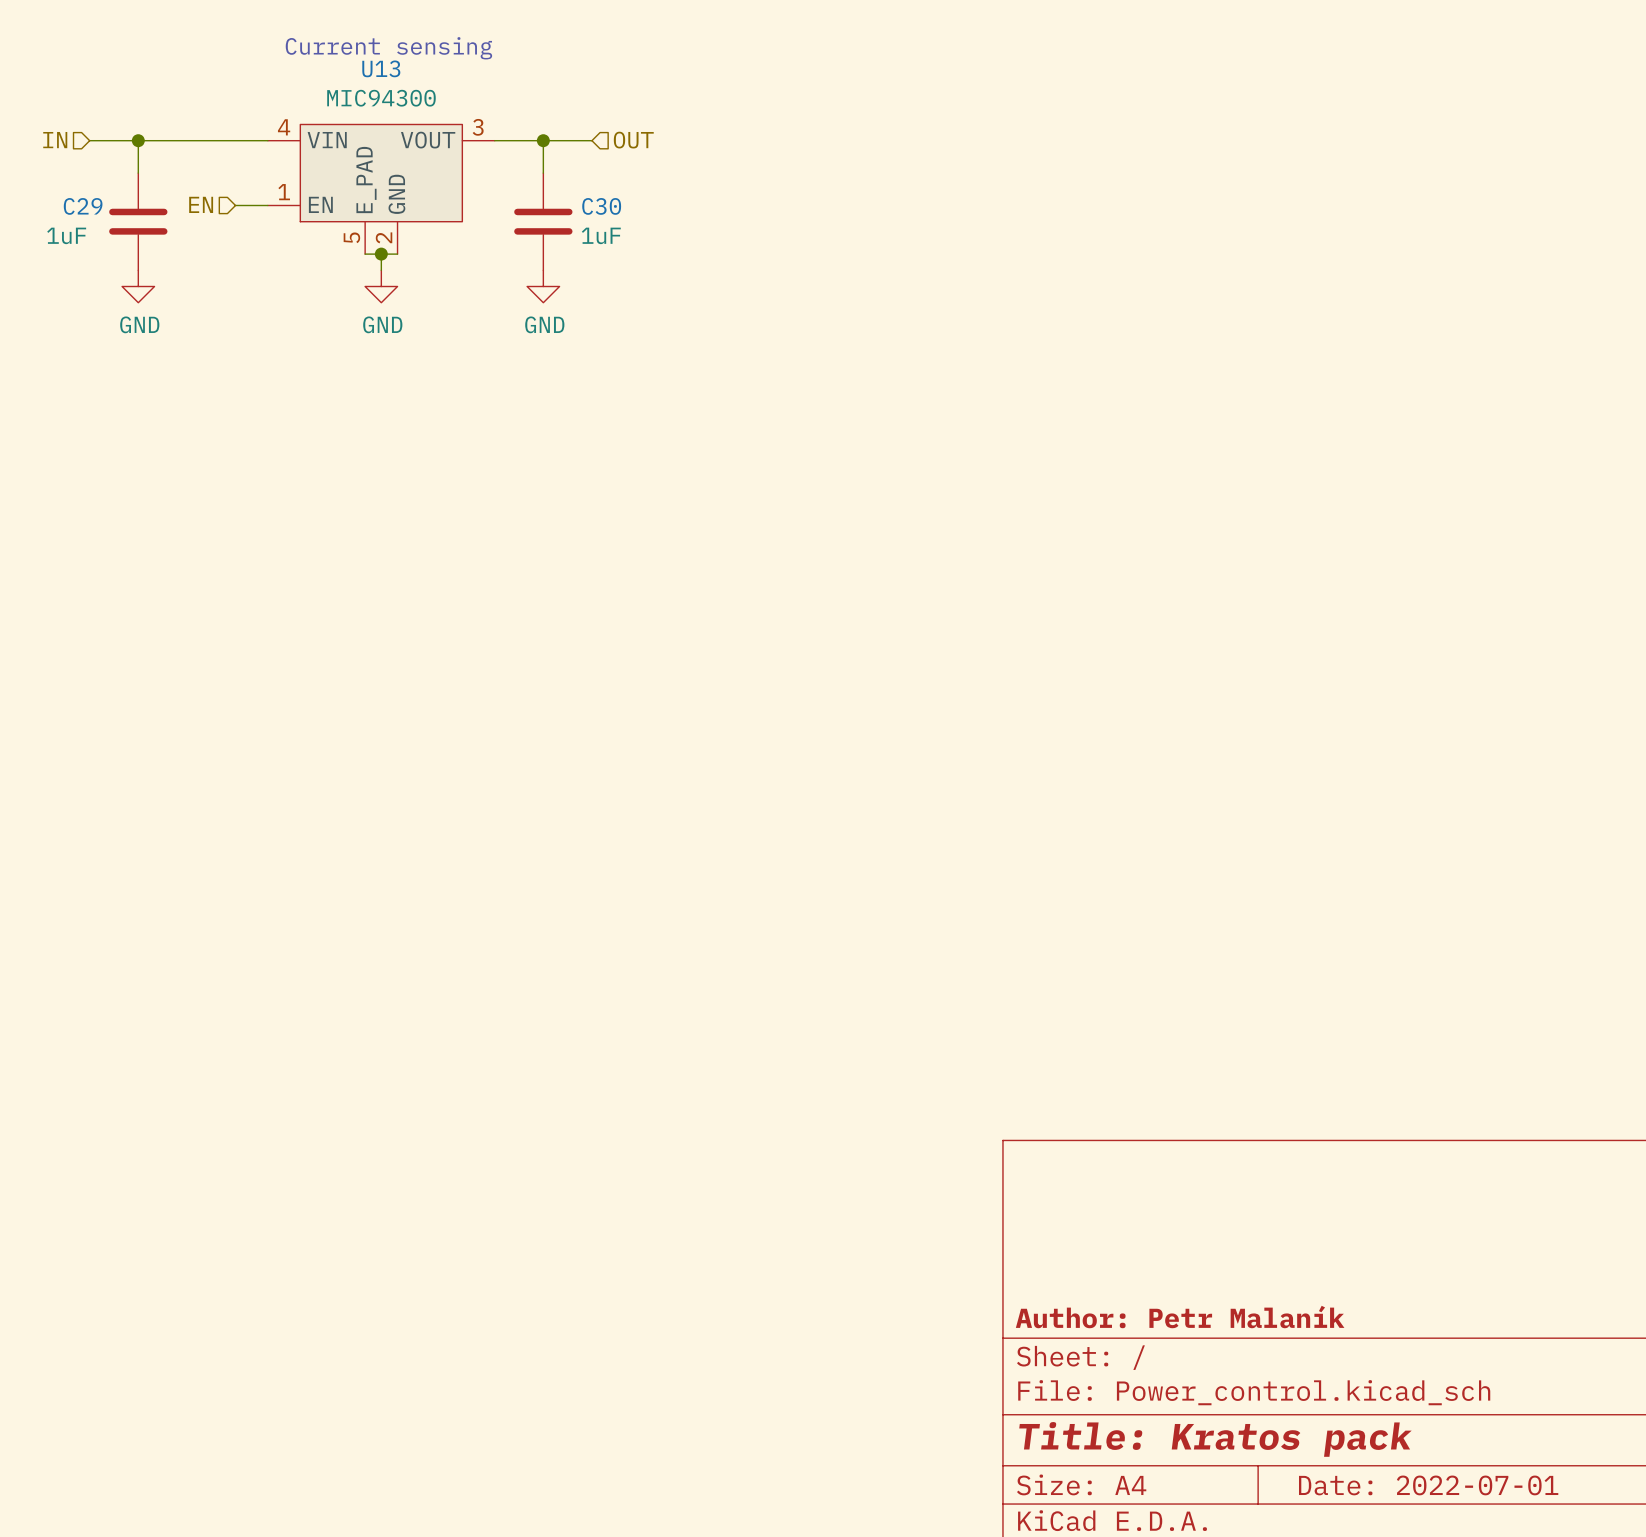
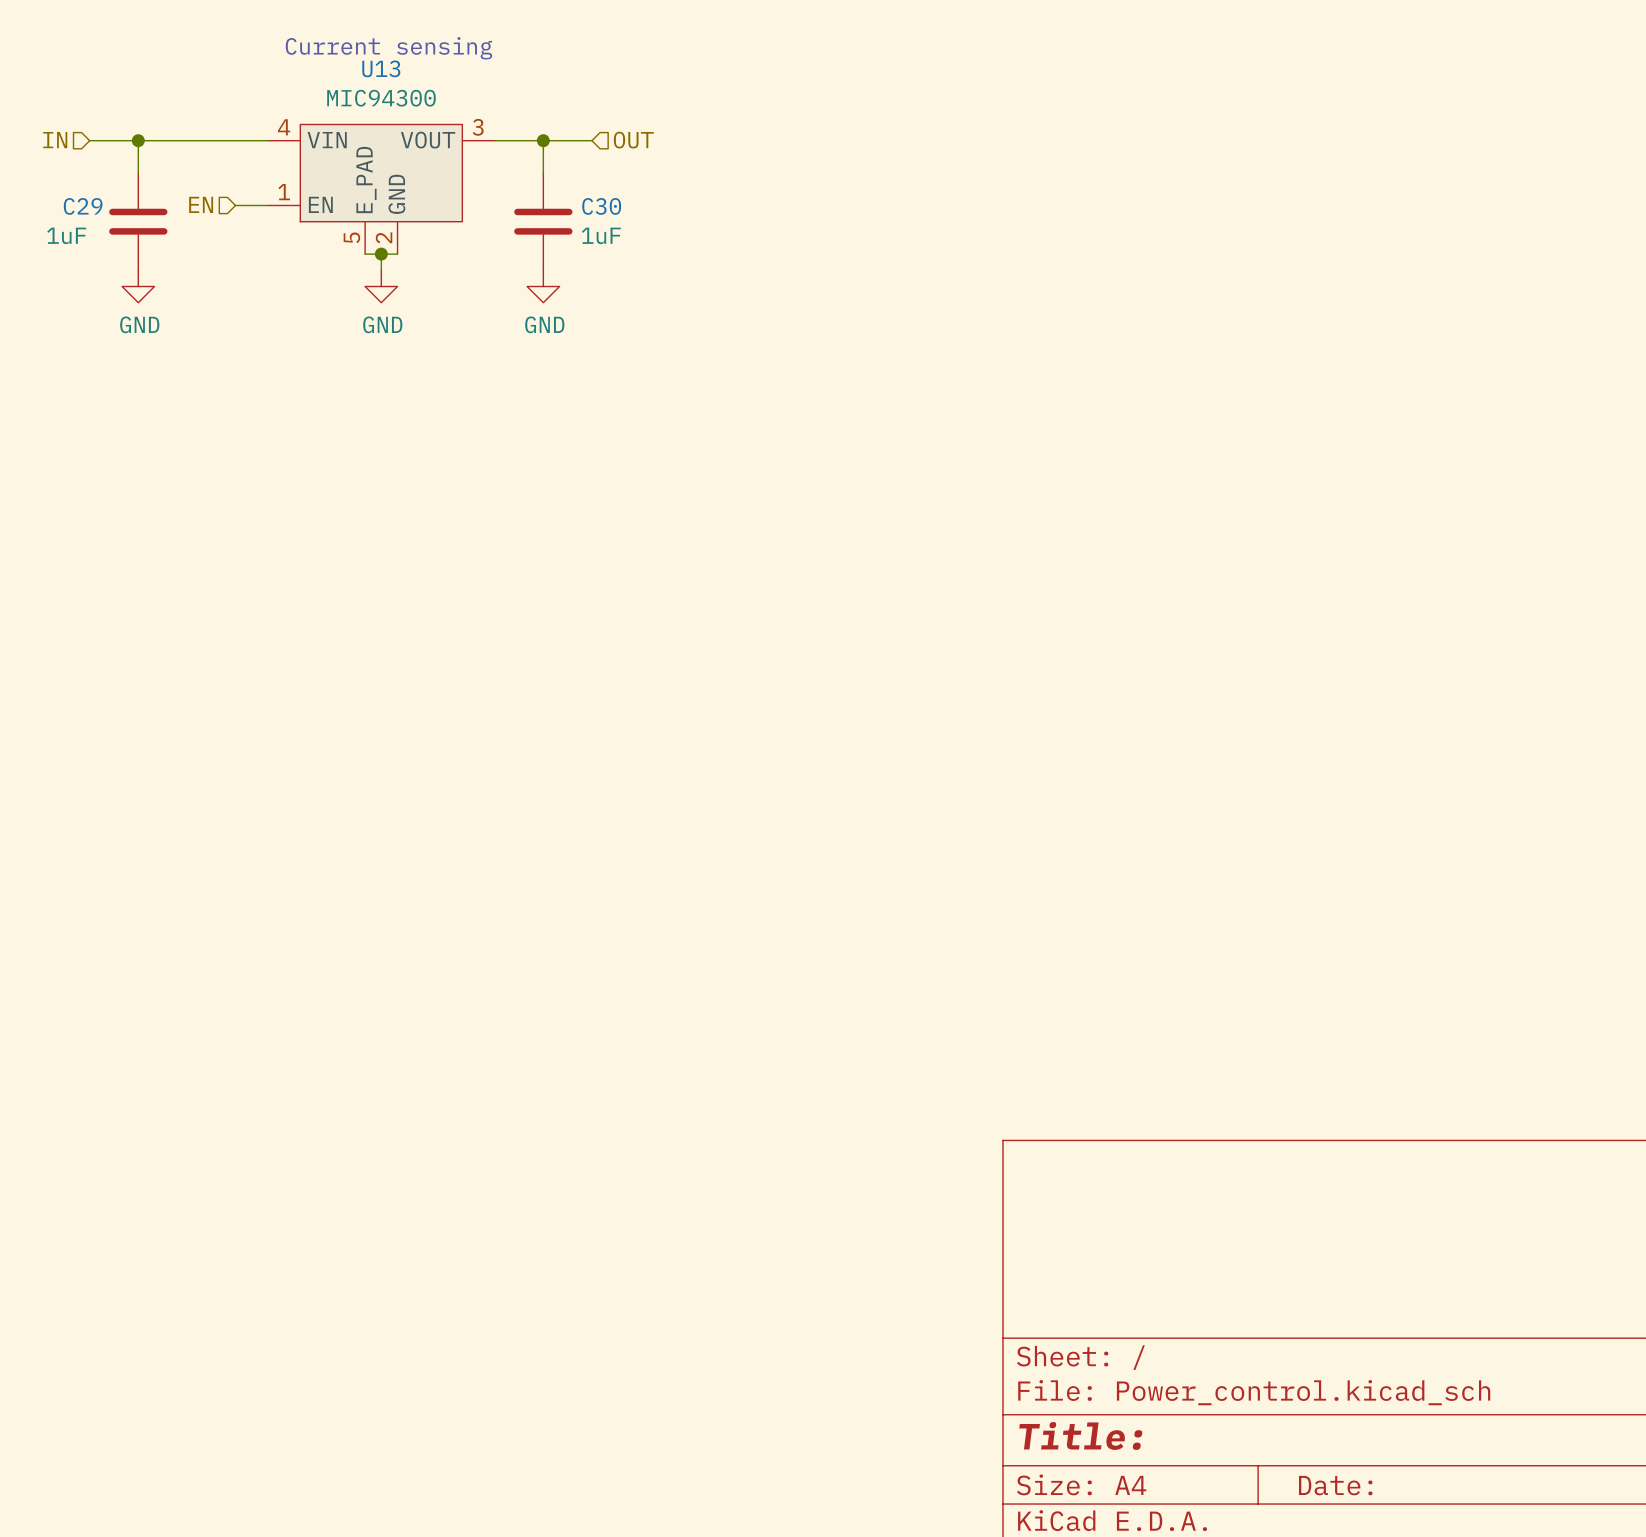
title block: Author: Petr Malaník (1180, 1317) -> none
title block: Title: Kratos pack (1215, 1439) -> Title: (1080, 1435)
title block: Date: 2022-07-01 (1428, 1485) -> Date: (1335, 1485)

